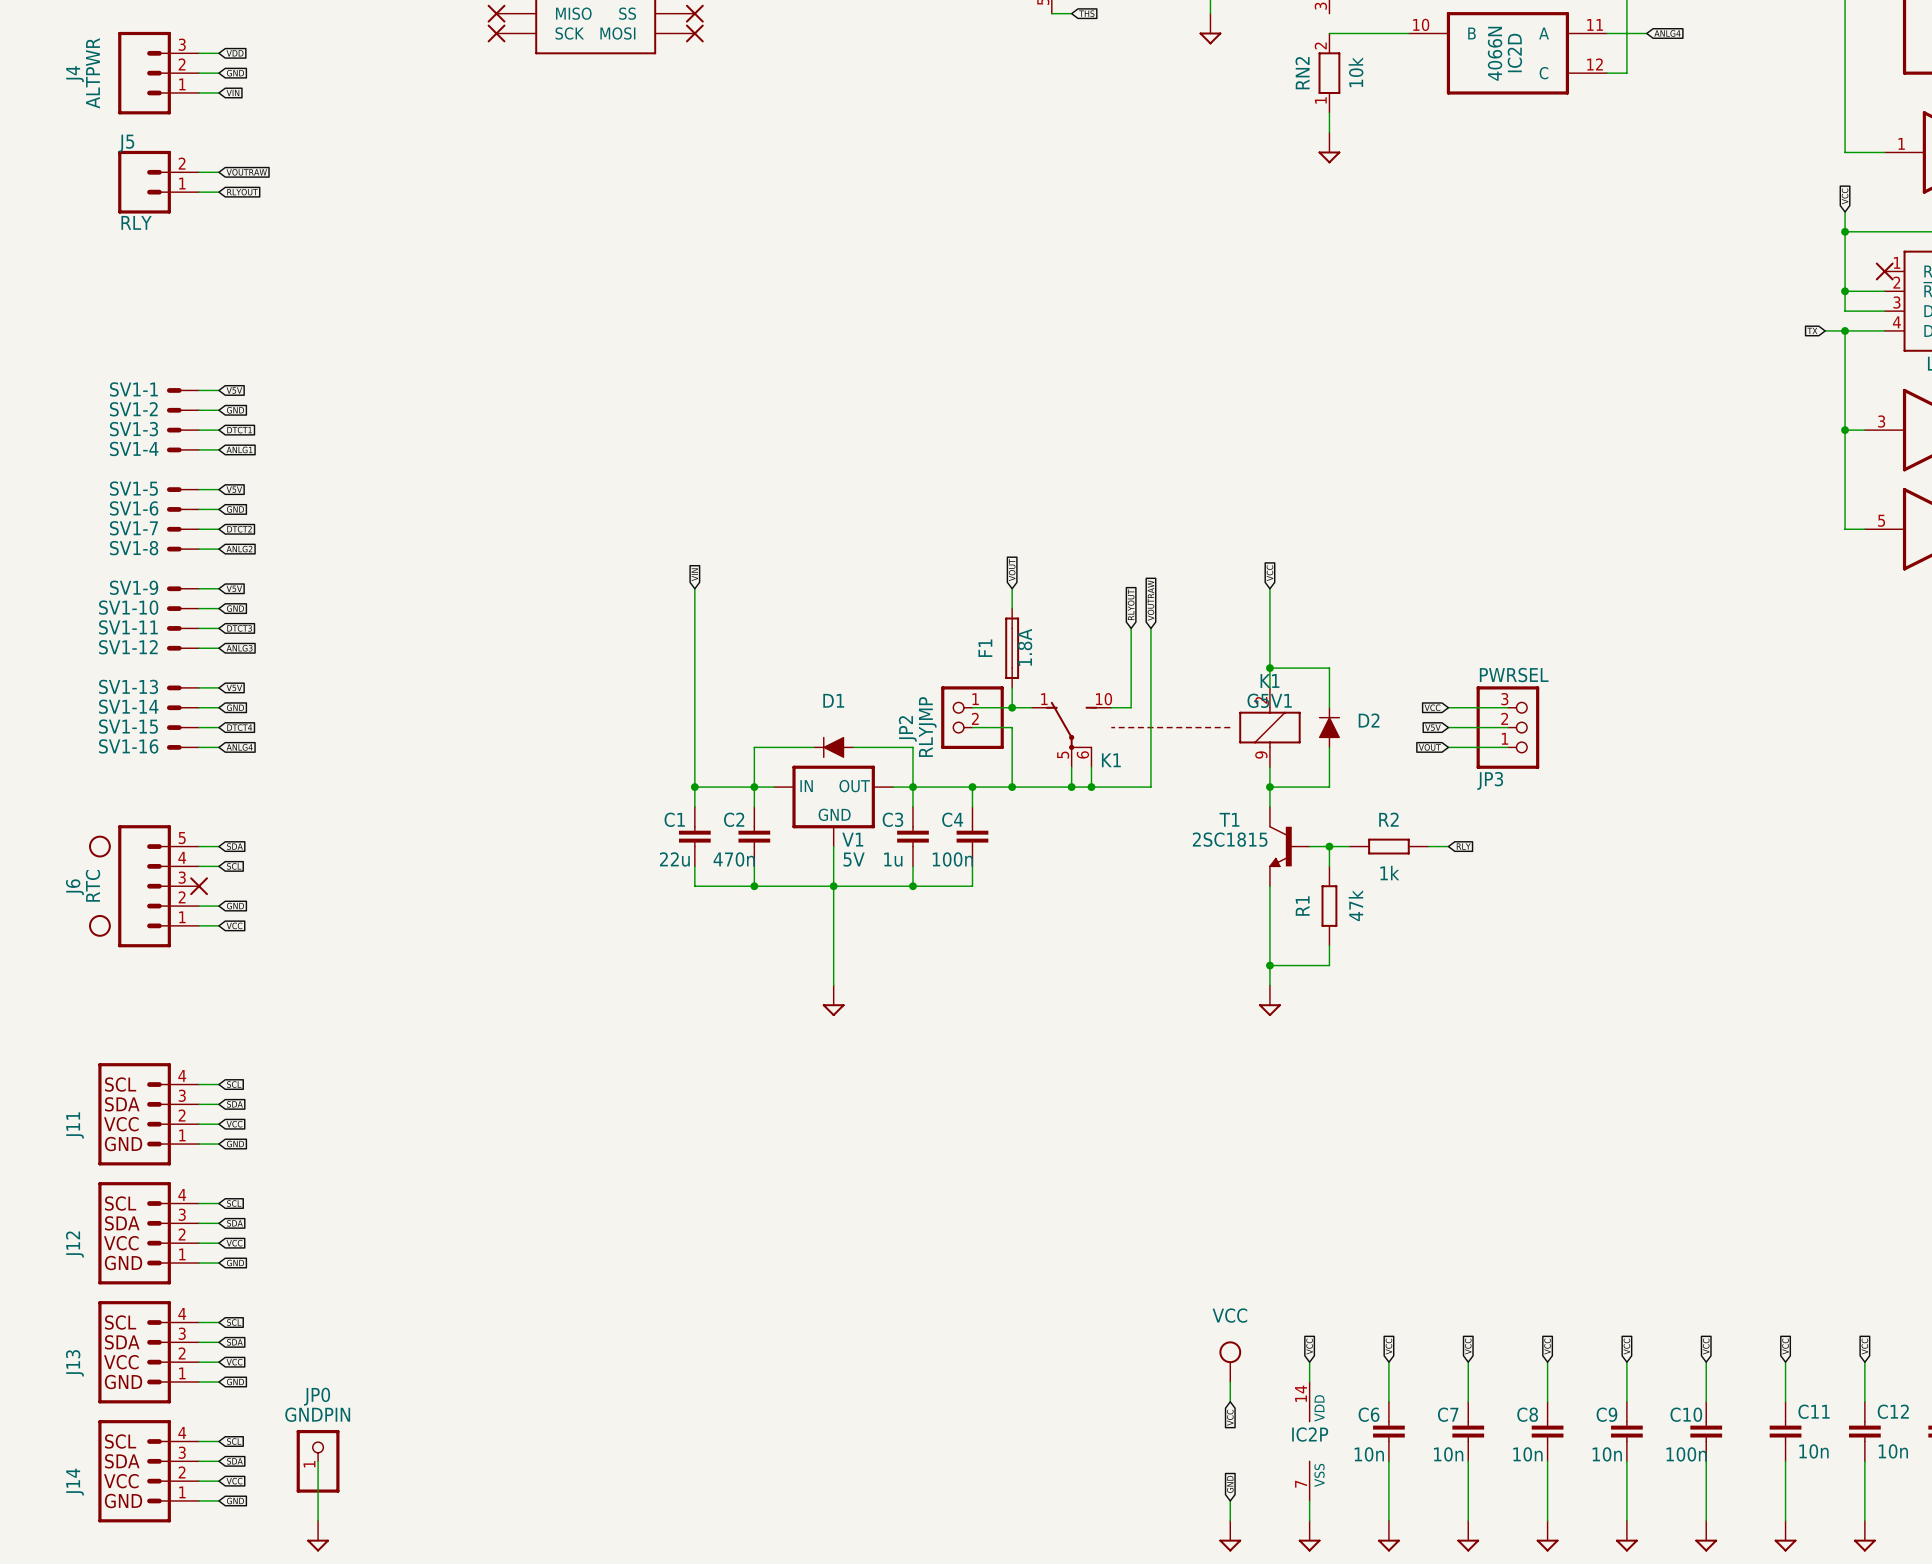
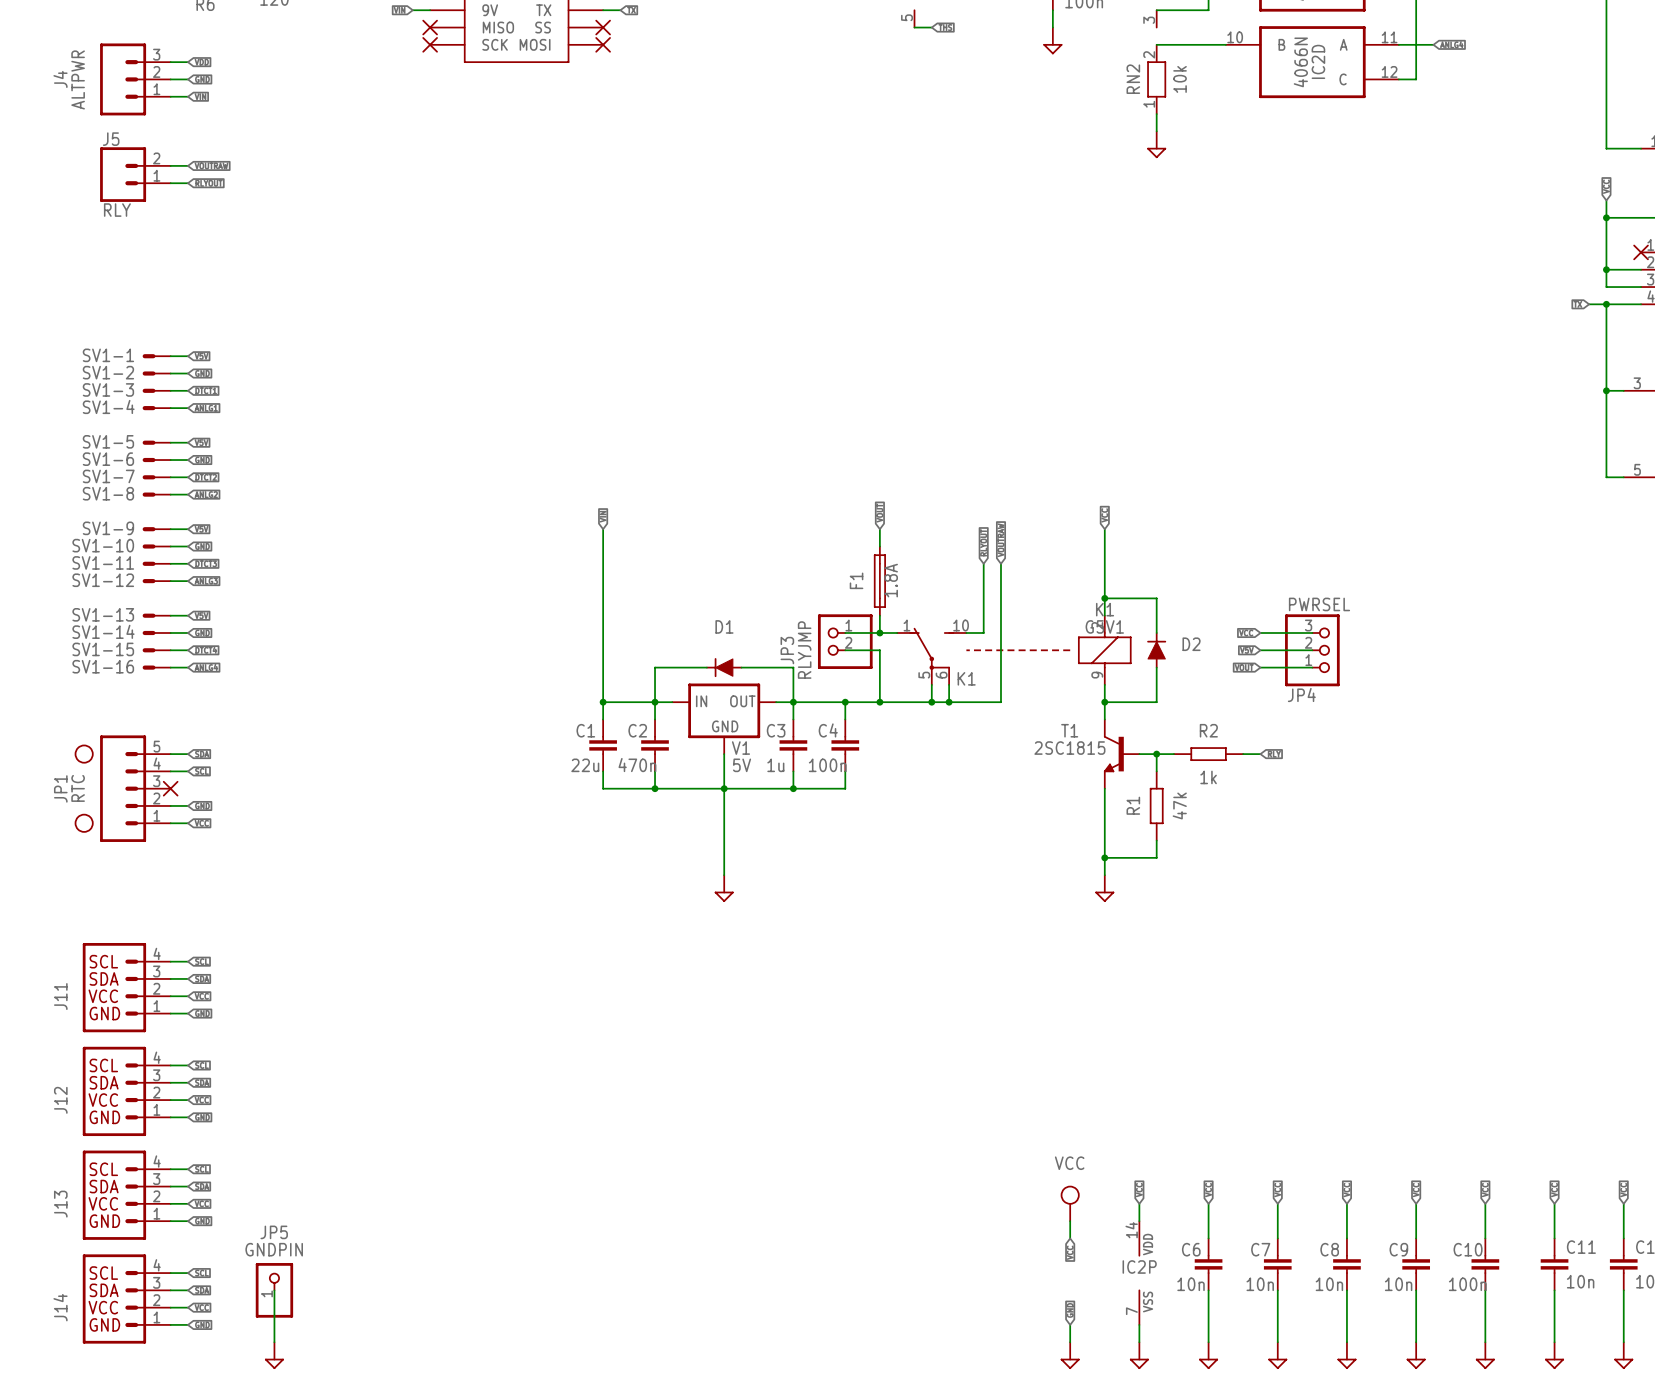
JP2 name: JP2 (907, 728) -> JP3 (787, 650)
JP3 name: JP3 (1490, 780) -> JP4 (1301, 694)
J6 name: J6 (74, 887) -> JP1 (60, 788)
JP0 name: JP0 (317, 1396) -> JP5 (274, 1232)

